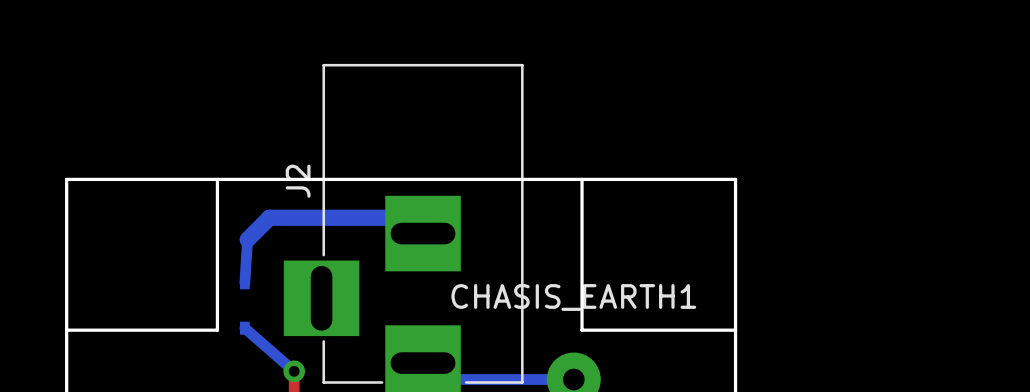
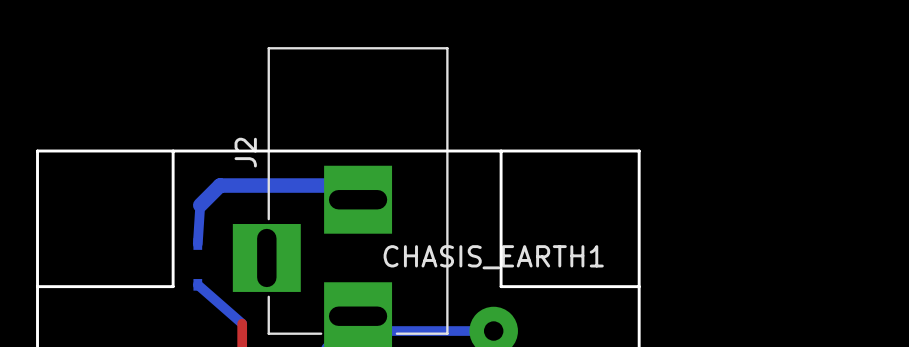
via: (294, 371) -> none

